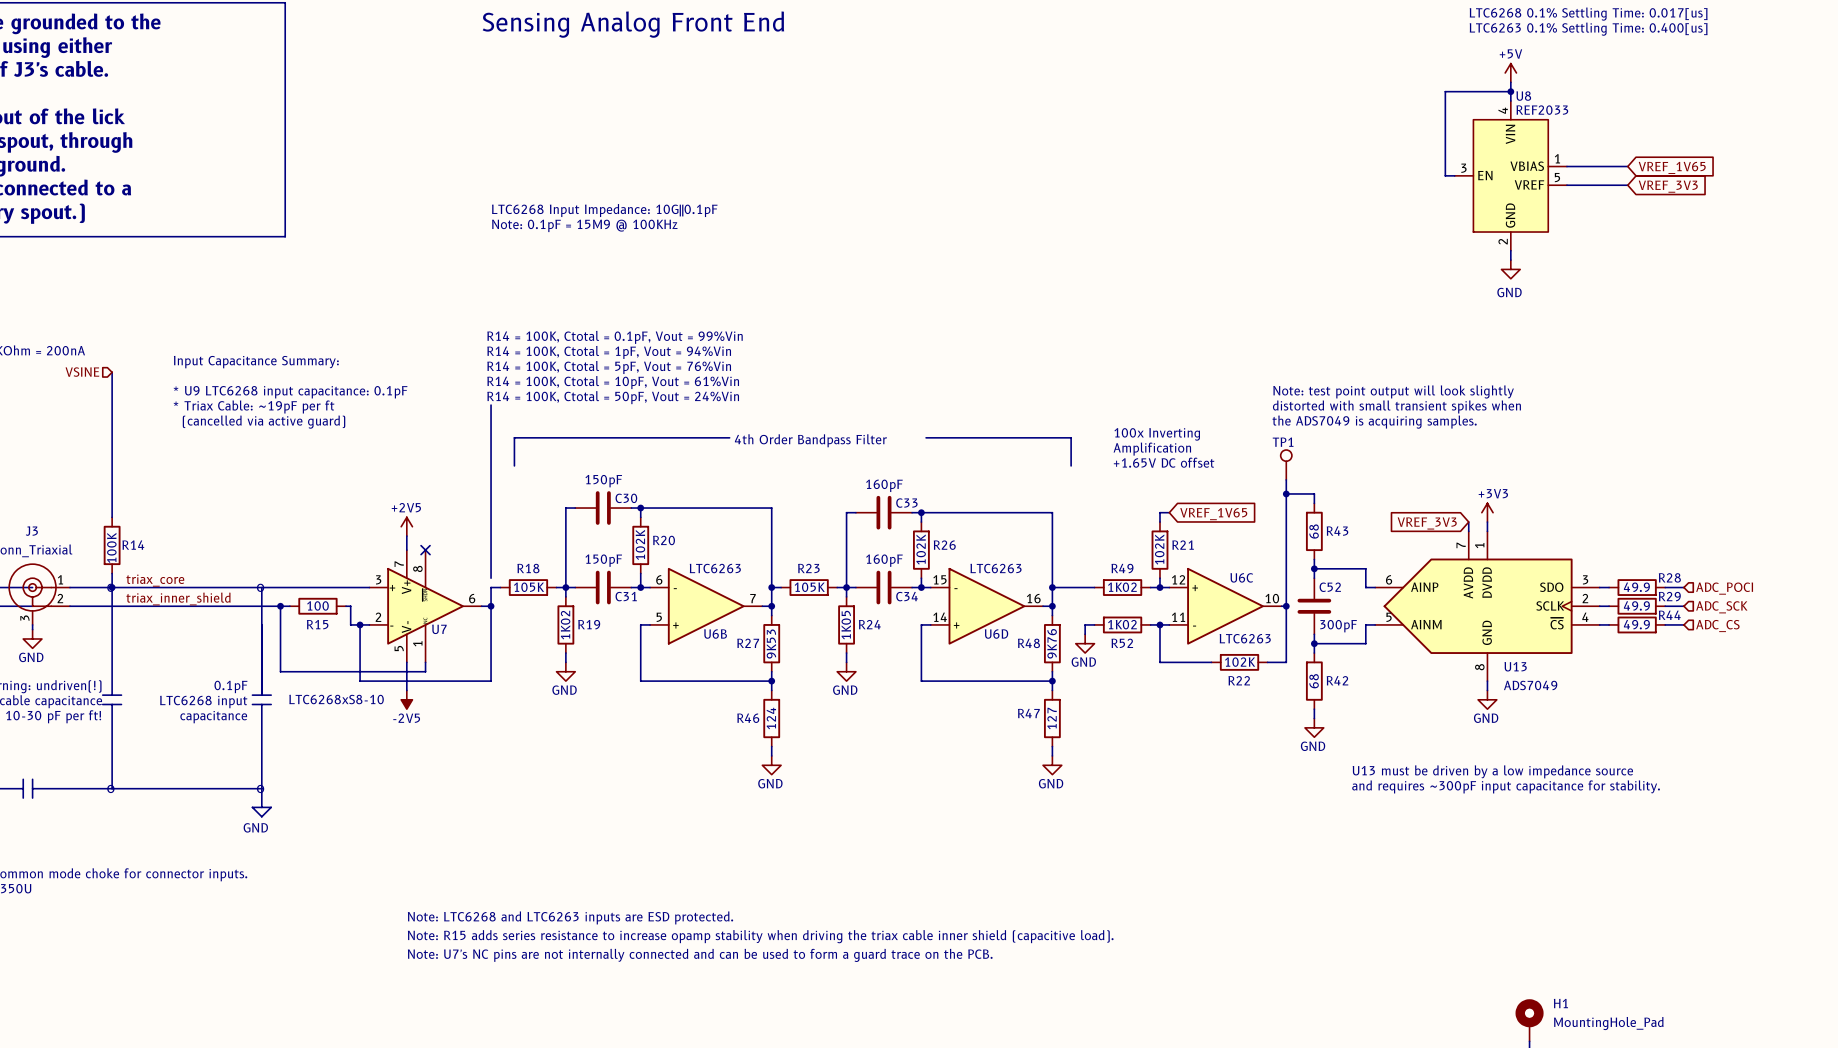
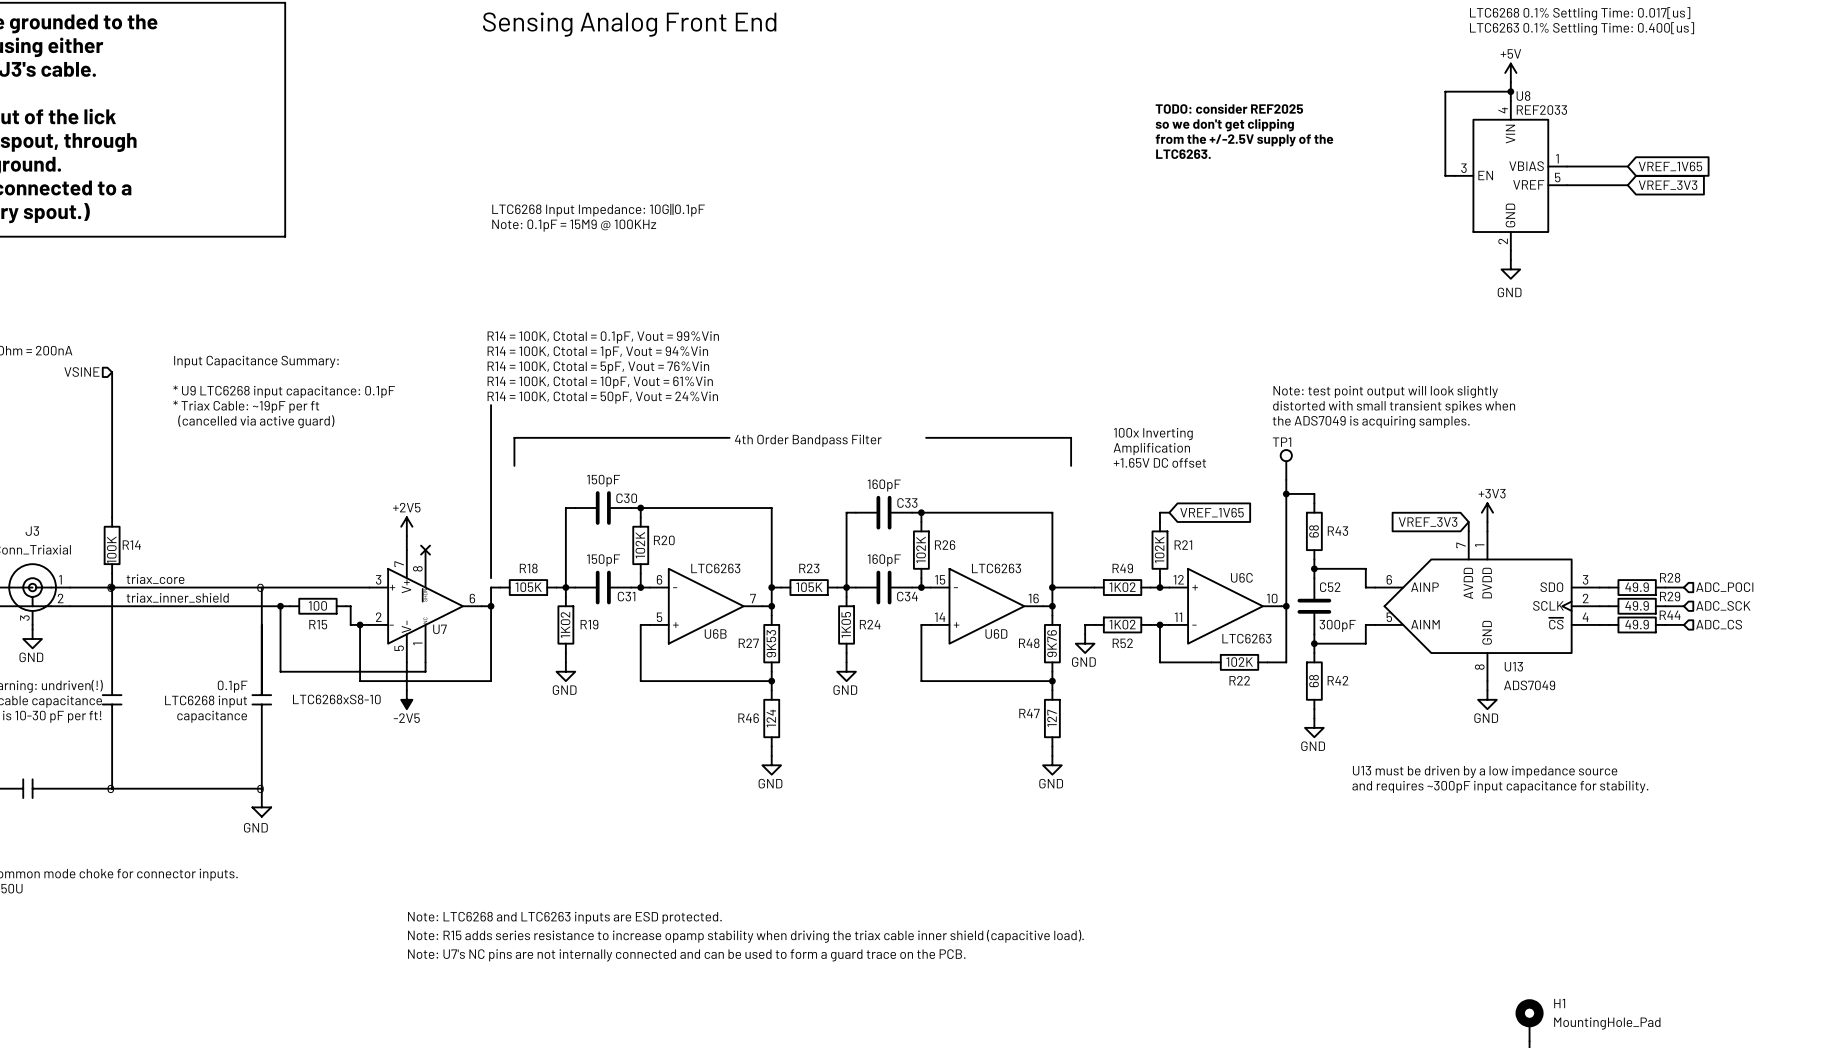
text: none -> TODO: consider REF2025 (1229, 108)
text: none -> so we don't get clipping (1224, 125)
text: none -> from the +/-2.5V supply of the (1244, 140)
text: none -> LTC6263. (1183, 154)

